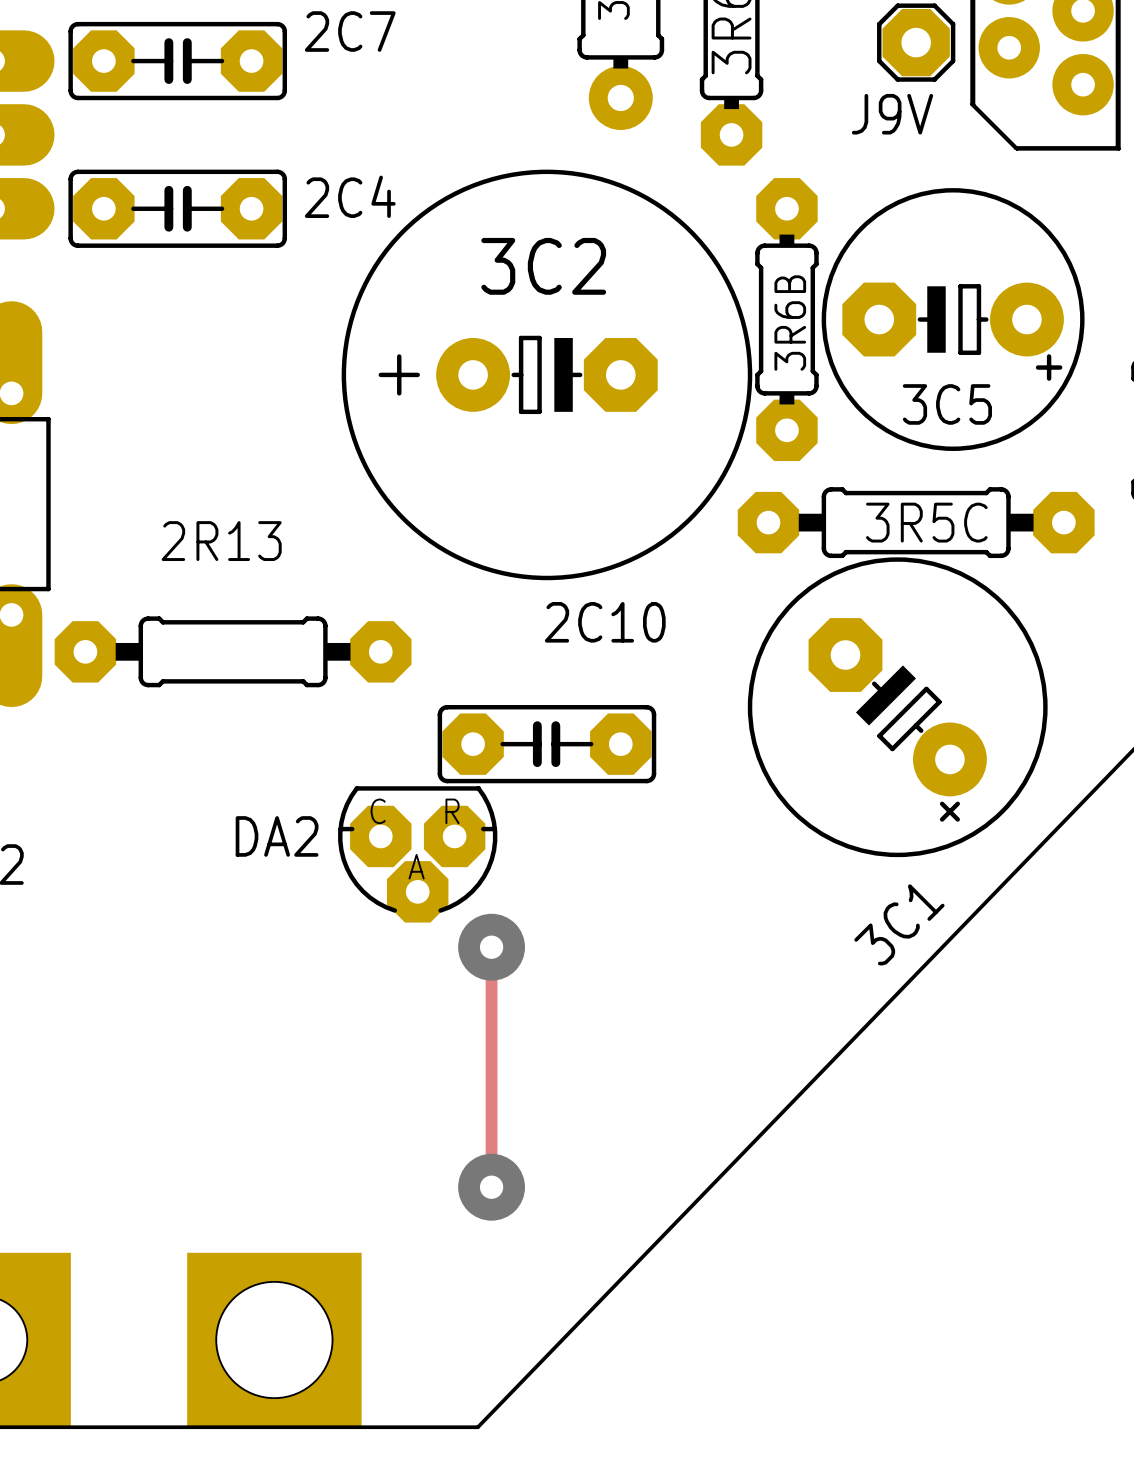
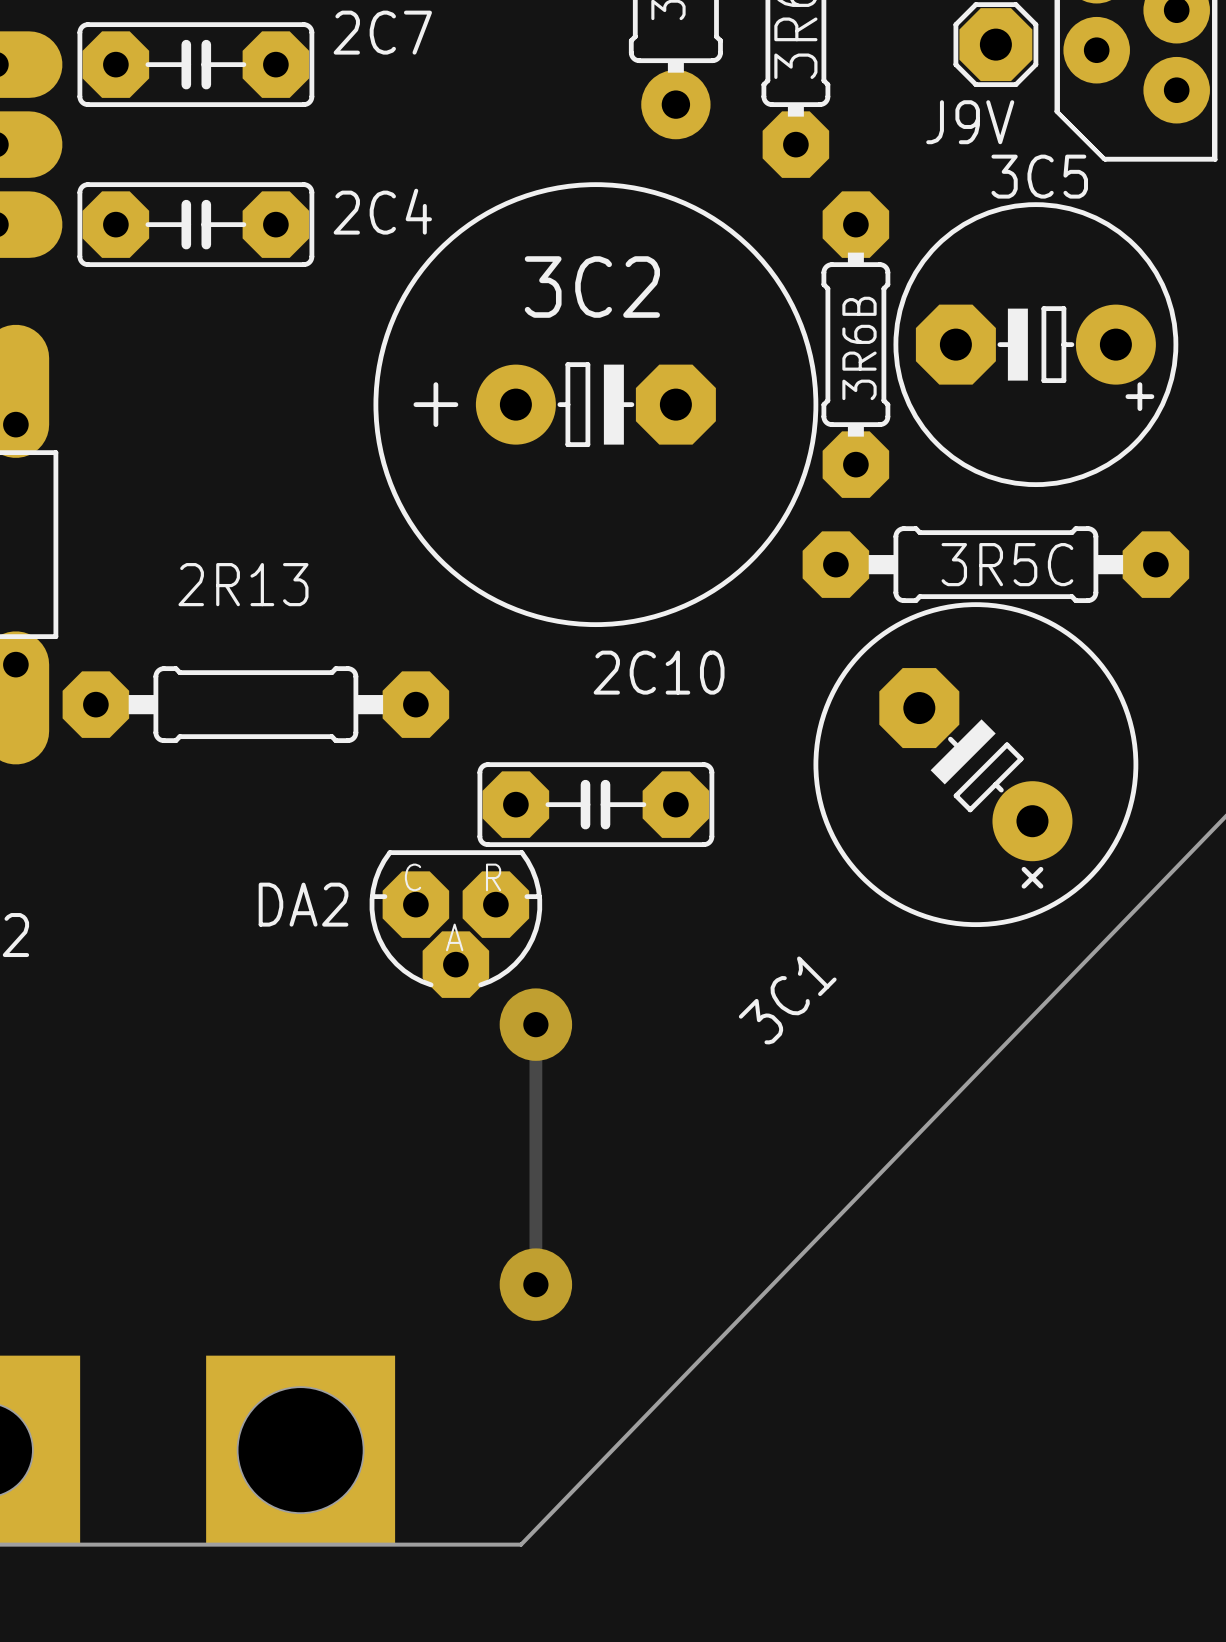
3C5 name position: 3C5 (947, 404) -> 3C5 (1039, 176)
3C1 name position: 3C1 (899, 924) -> 3C1 (787, 1000)

